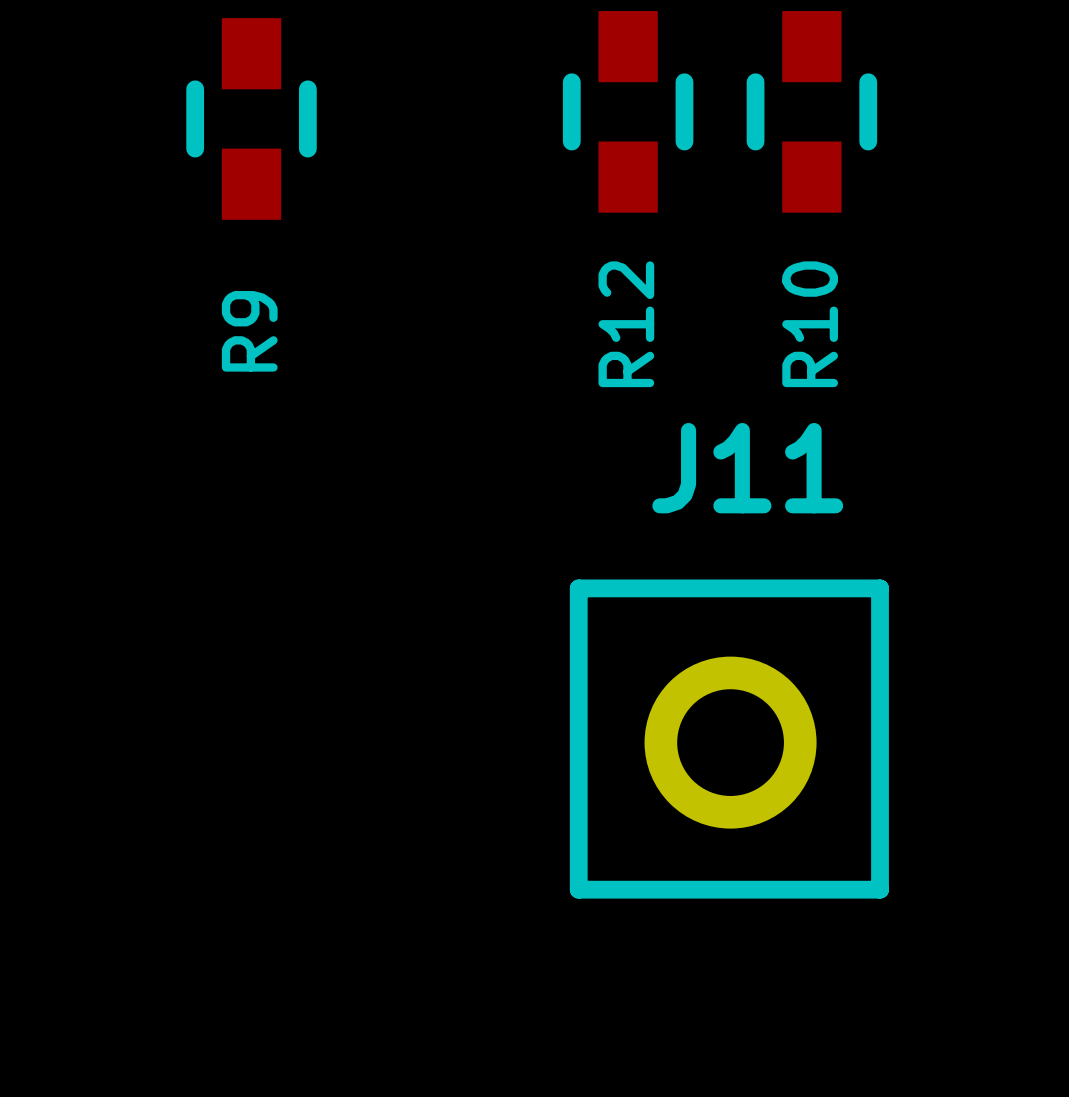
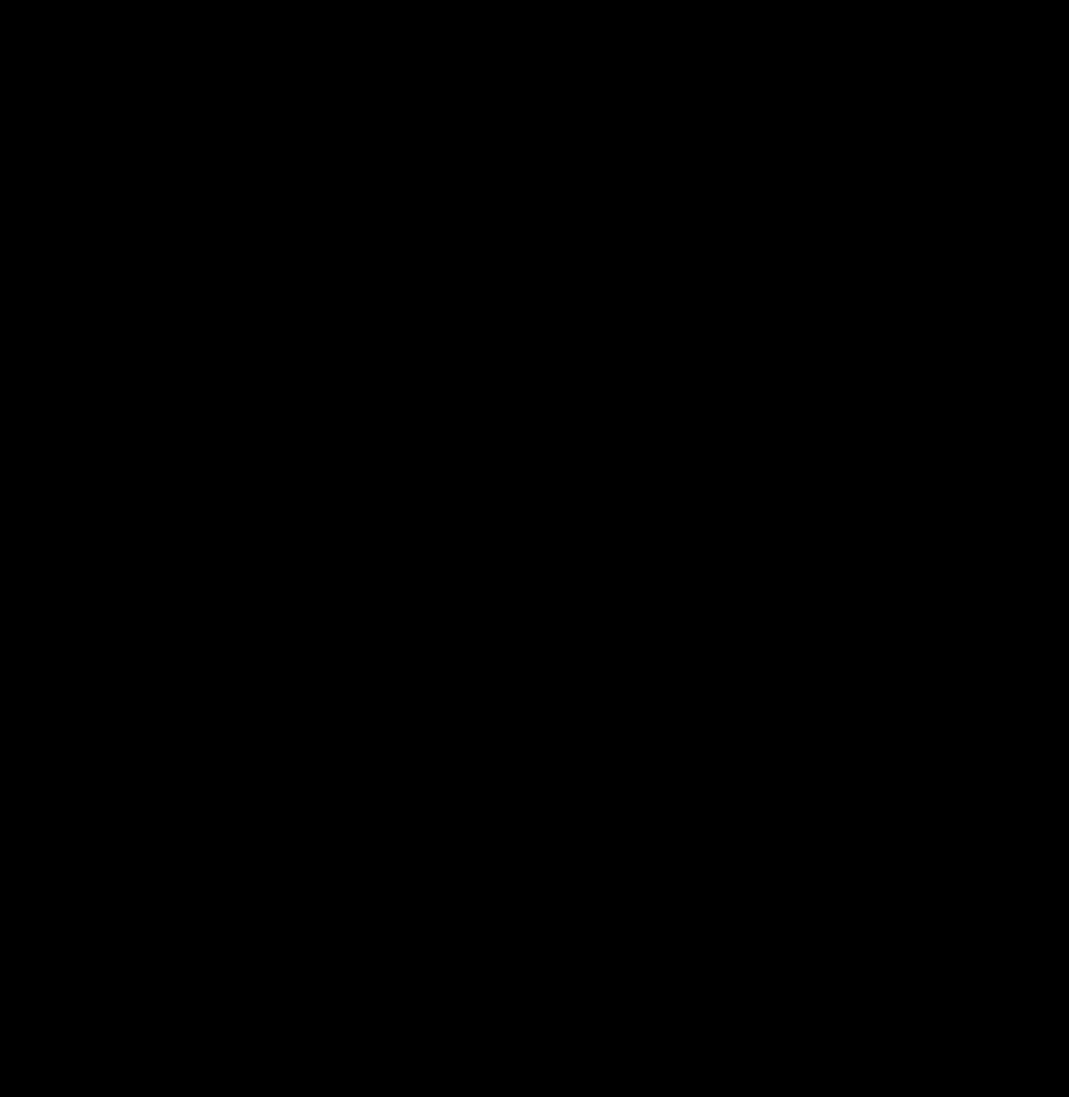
R12: (628, 111) -> none
R10: (811, 111) -> none
R9: (251, 118) -> none
J11: (729, 739) -> none

